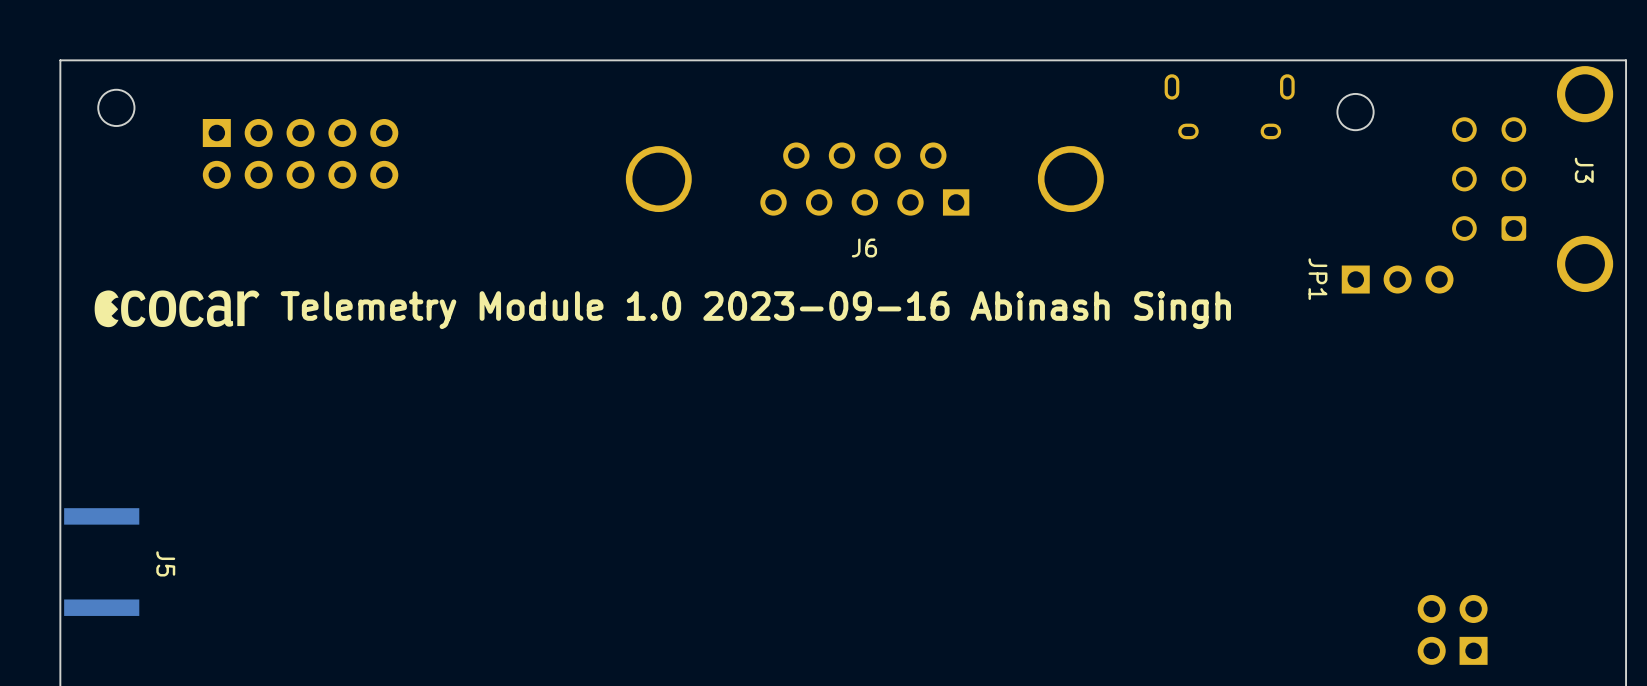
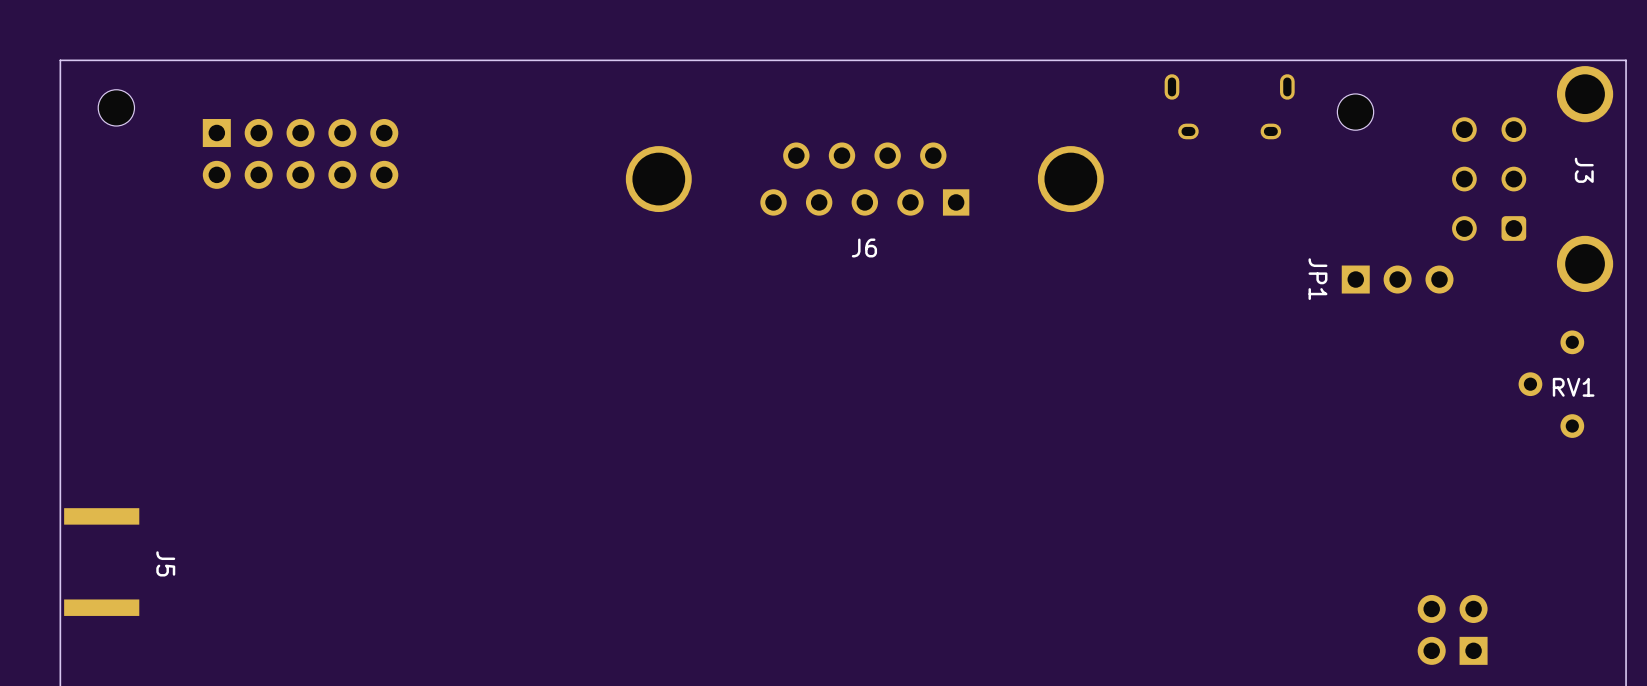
drawing: [94, 290, 260, 328] -> none
text: Telemetry Module 1.0 2023-09-16 Abinash Singh (755, 310) -> none
RV1: none -> (1551, 384)

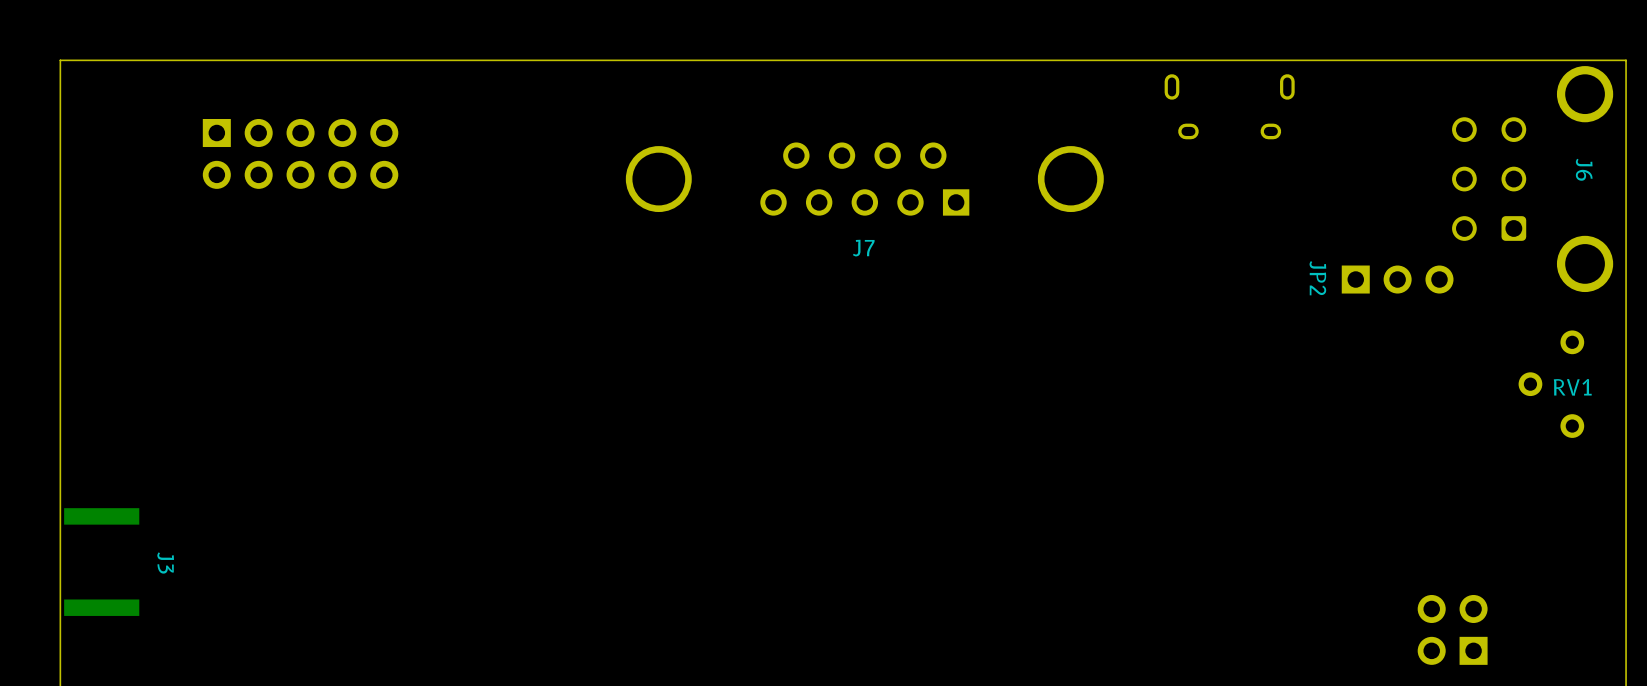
part: (116, 107) -> none
part: (1355, 112) -> none
J3 name: J3 (1584, 170) -> J6 (1584, 169)
J6 name: J6 (864, 247) -> J7 (863, 248)
JP1 name: JP1 (1317, 279) -> JP2 (1317, 278)
J5 name: J5 (165, 563) -> J3 (165, 562)

